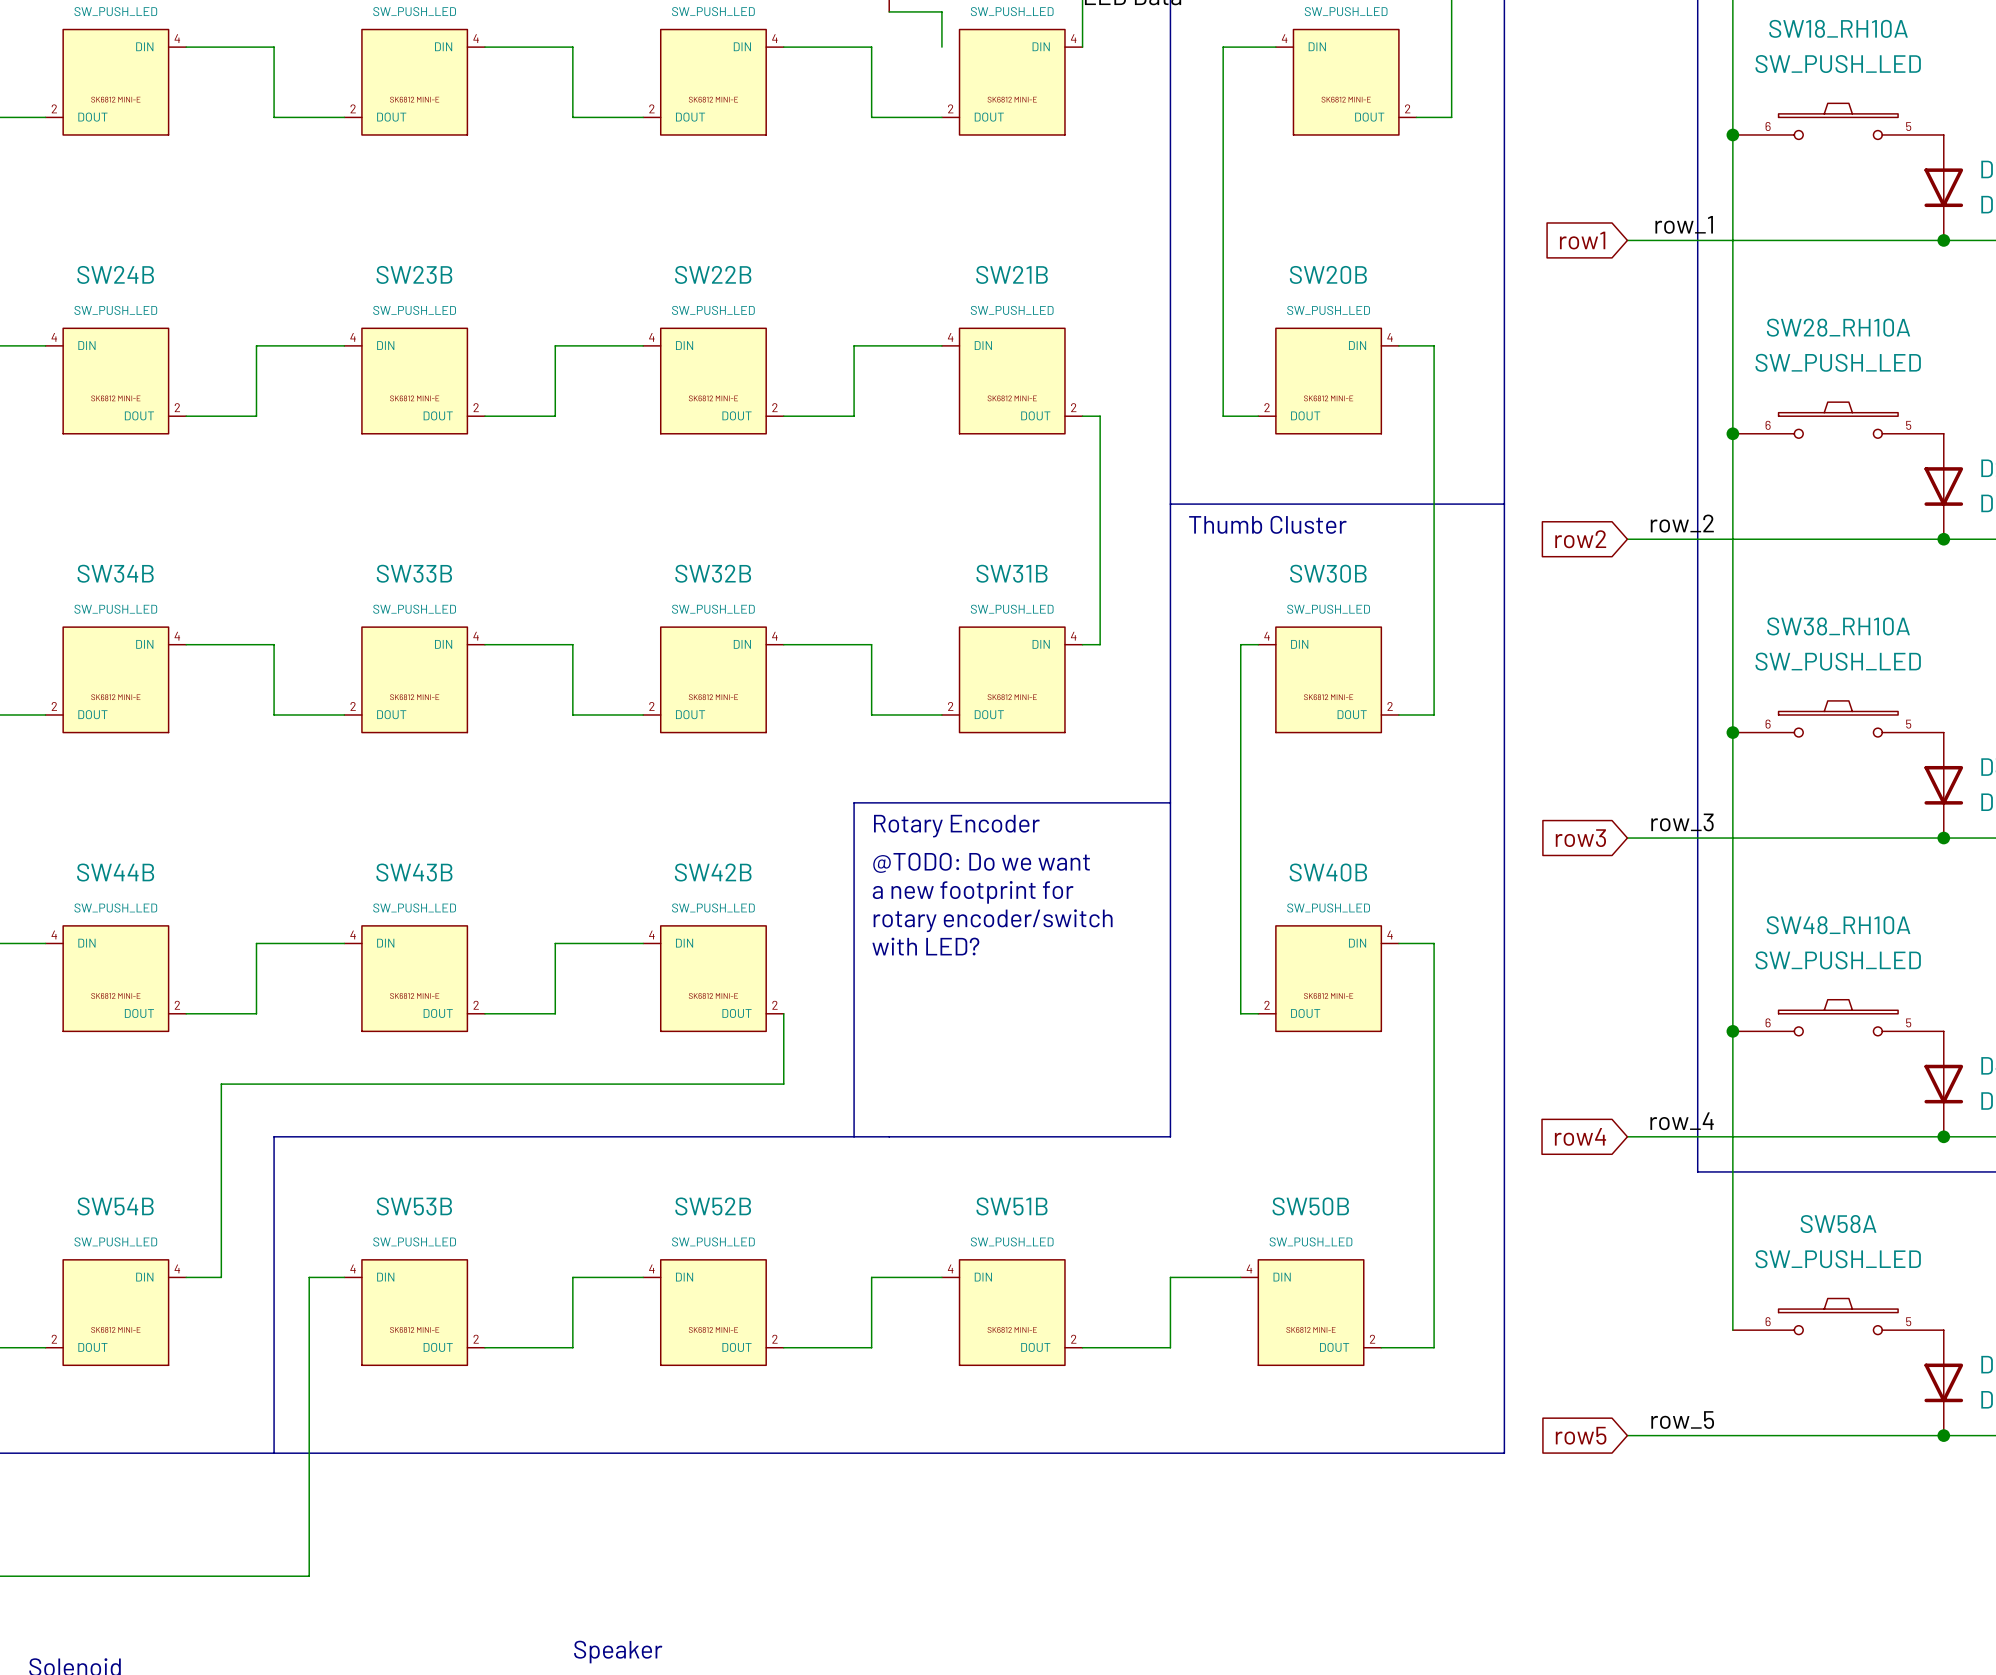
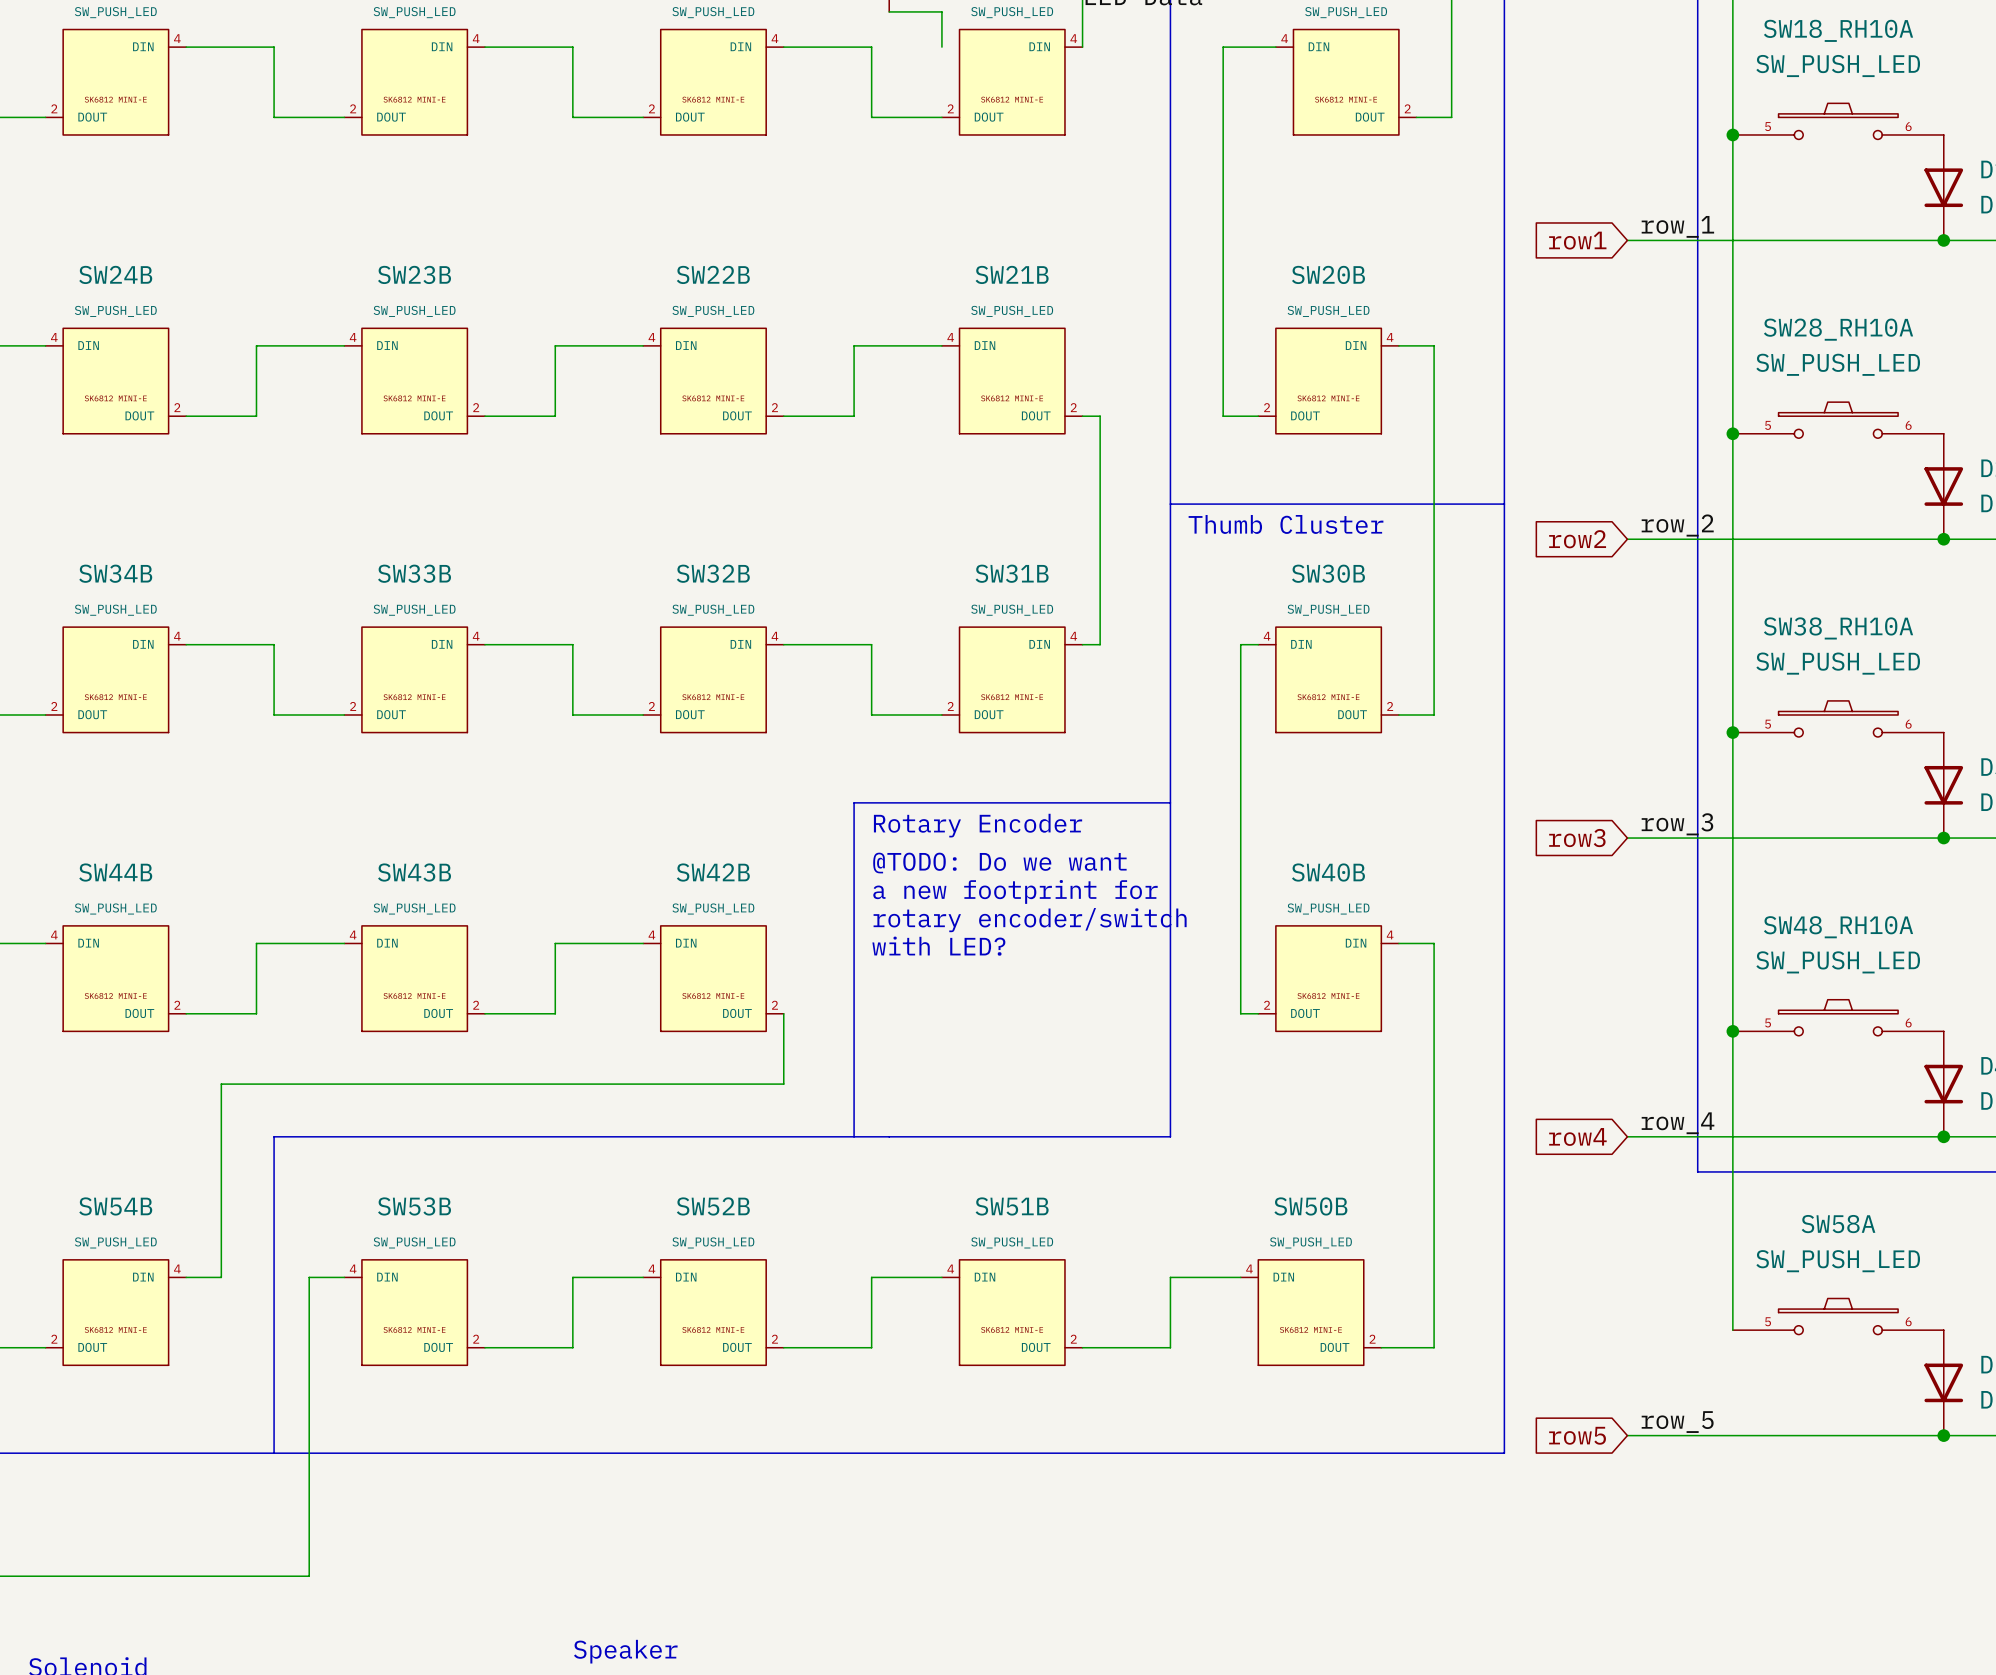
SW18_RH10A flip: as is (1838, 110) -> left-right (1838, 110)
SW28_RH10A flip: as is (1838, 409) -> left-right (1838, 409)
SW38_RH10A flip: as is (1838, 707) -> left-right (1838, 707)
SW48_RH10A flip: as is (1838, 1006) -> left-right (1838, 1006)
SW58A flip: as is (1838, 1305) -> left-right (1838, 1305)

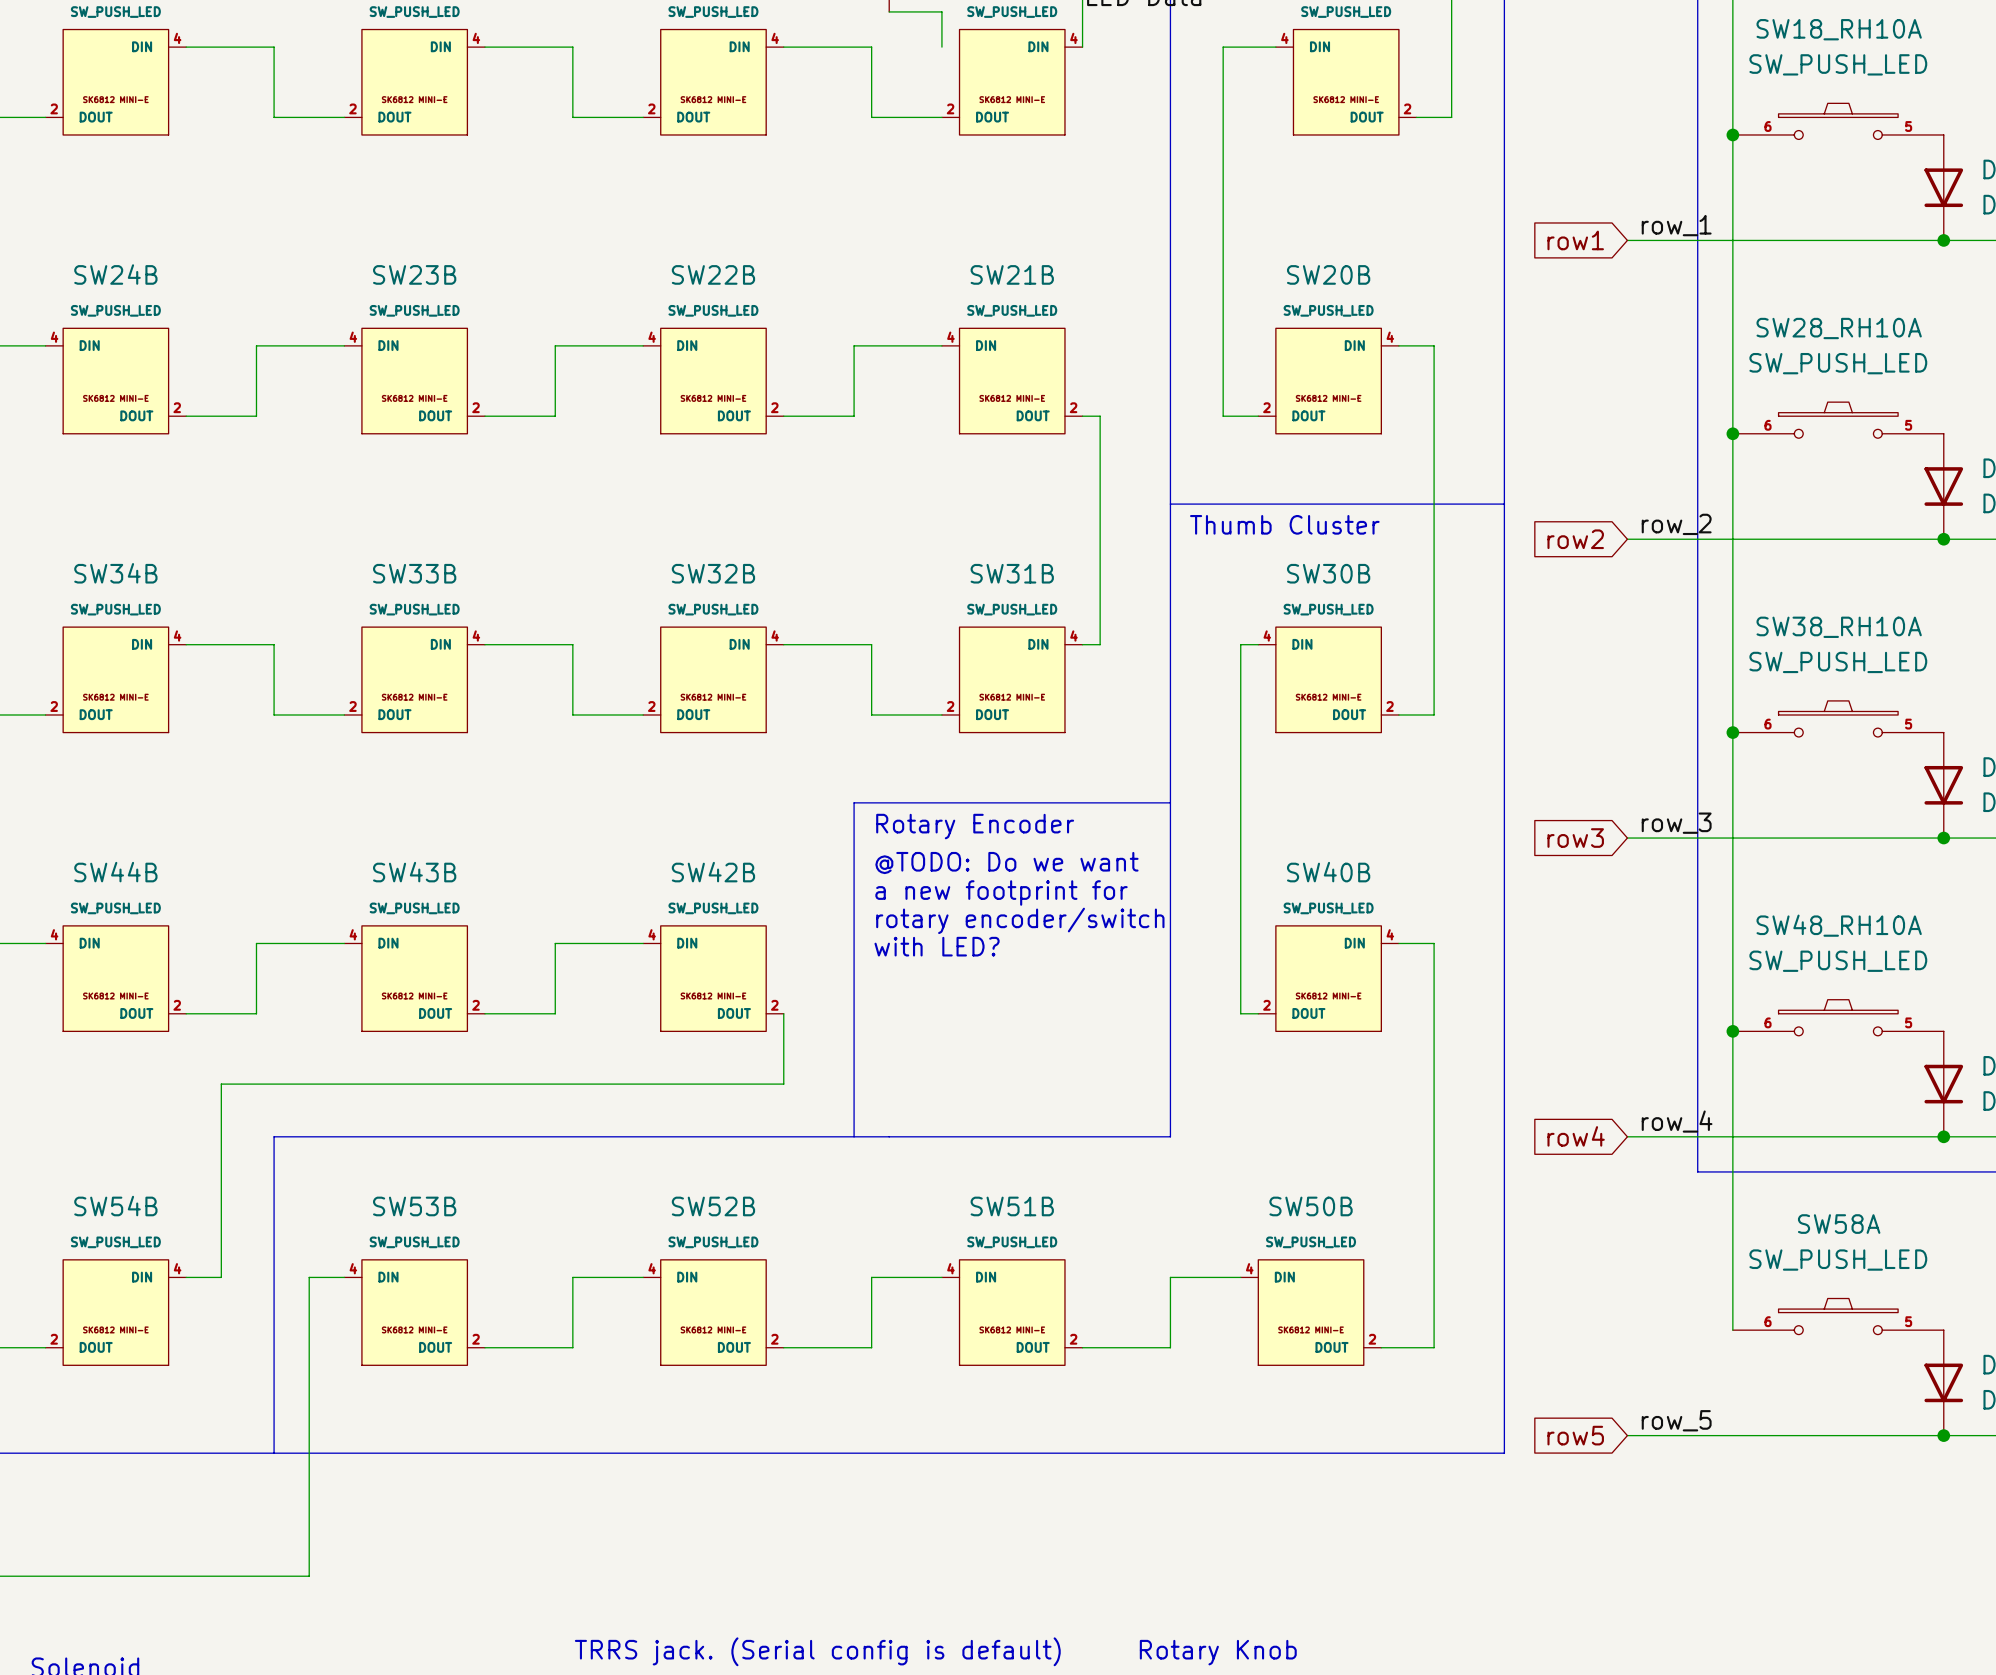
SW18_RH10A flip: as is (1838, 110) -> left-right (1838, 110)
SW28_RH10A flip: as is (1838, 409) -> left-right (1838, 409)
SW38_RH10A flip: as is (1838, 707) -> left-right (1838, 707)
SW48_RH10A flip: as is (1838, 1006) -> left-right (1838, 1006)
SW58A flip: as is (1838, 1305) -> left-right (1838, 1305)
text: Speaker (625, 1651) -> TRRS jack. (Serial config is default) (817, 1651)
text: none -> Rotary Knob (1218, 1652)

